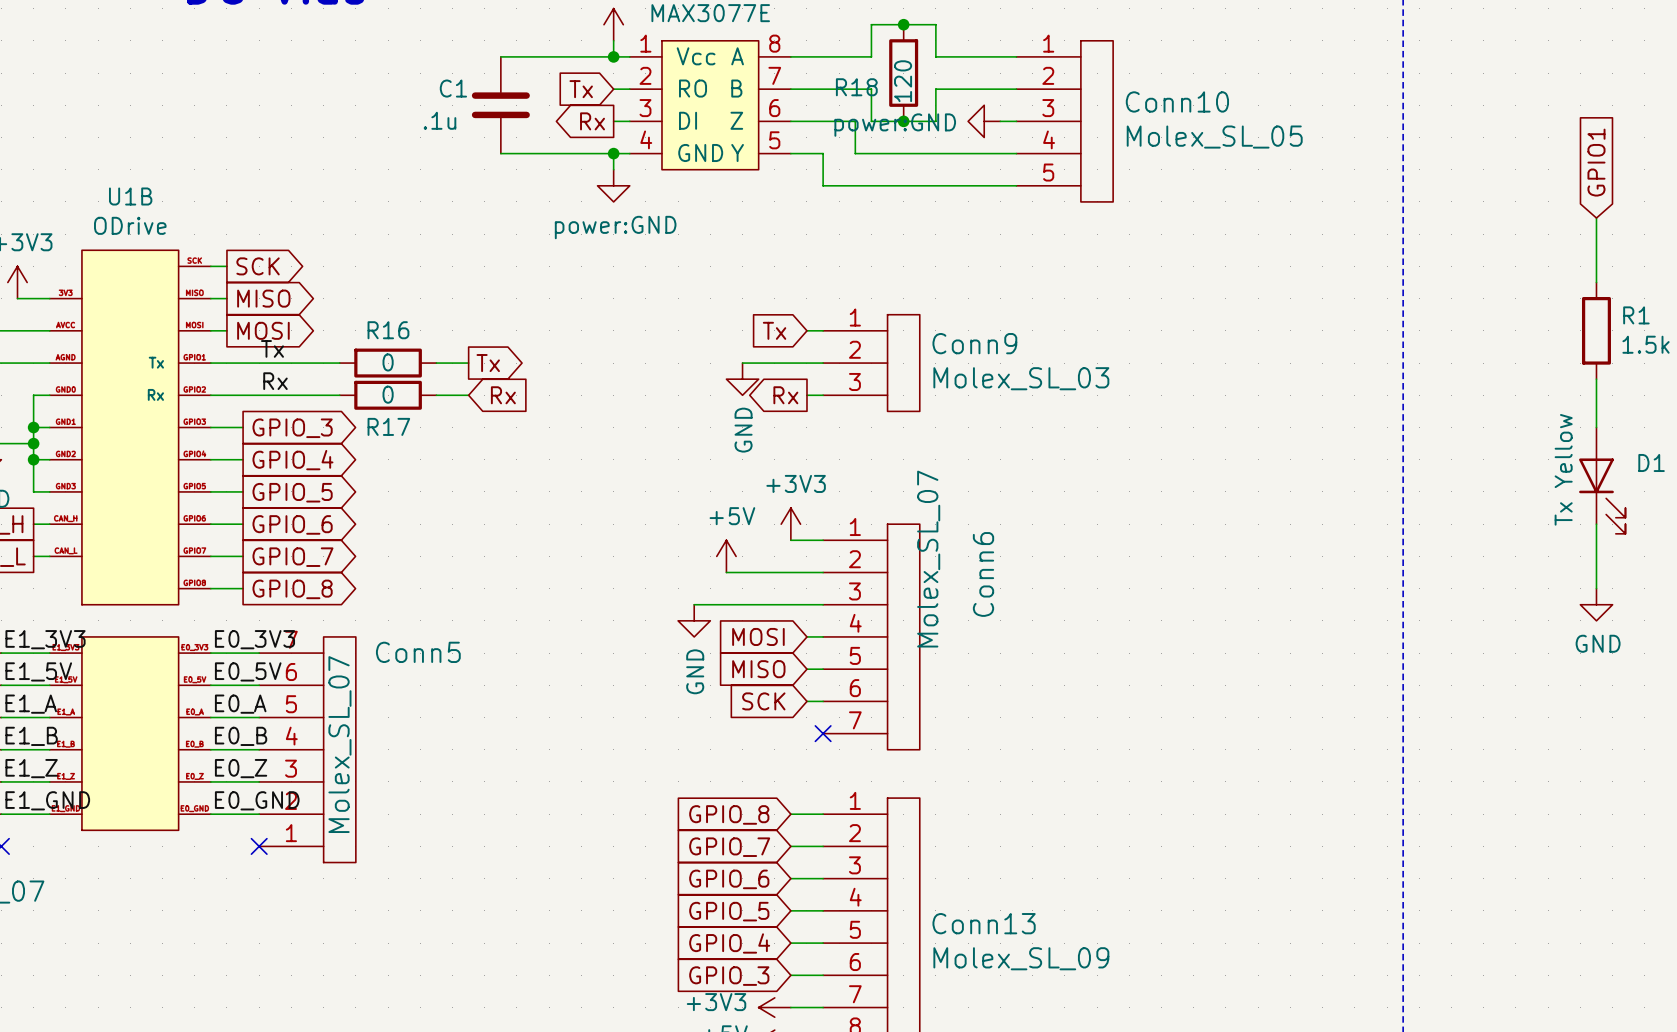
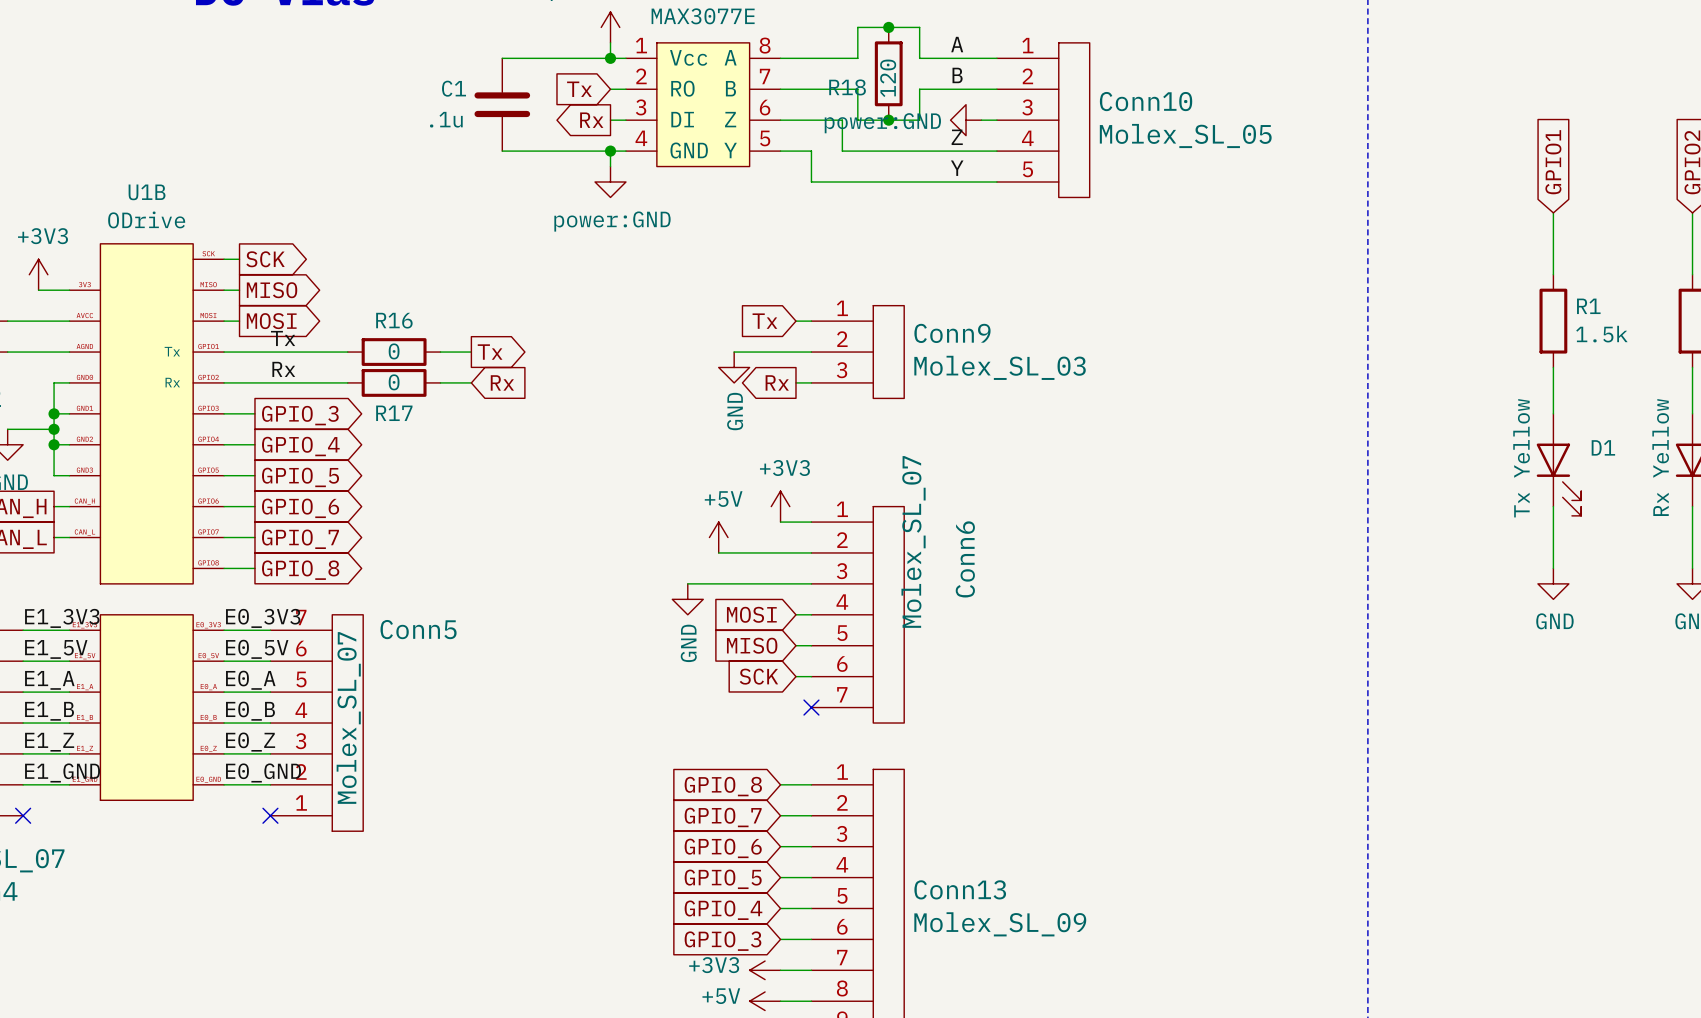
label: none -> A (957, 44)
label: none -> B (957, 75)
label: none -> Z (957, 137)
label: none -> Y (957, 168)

